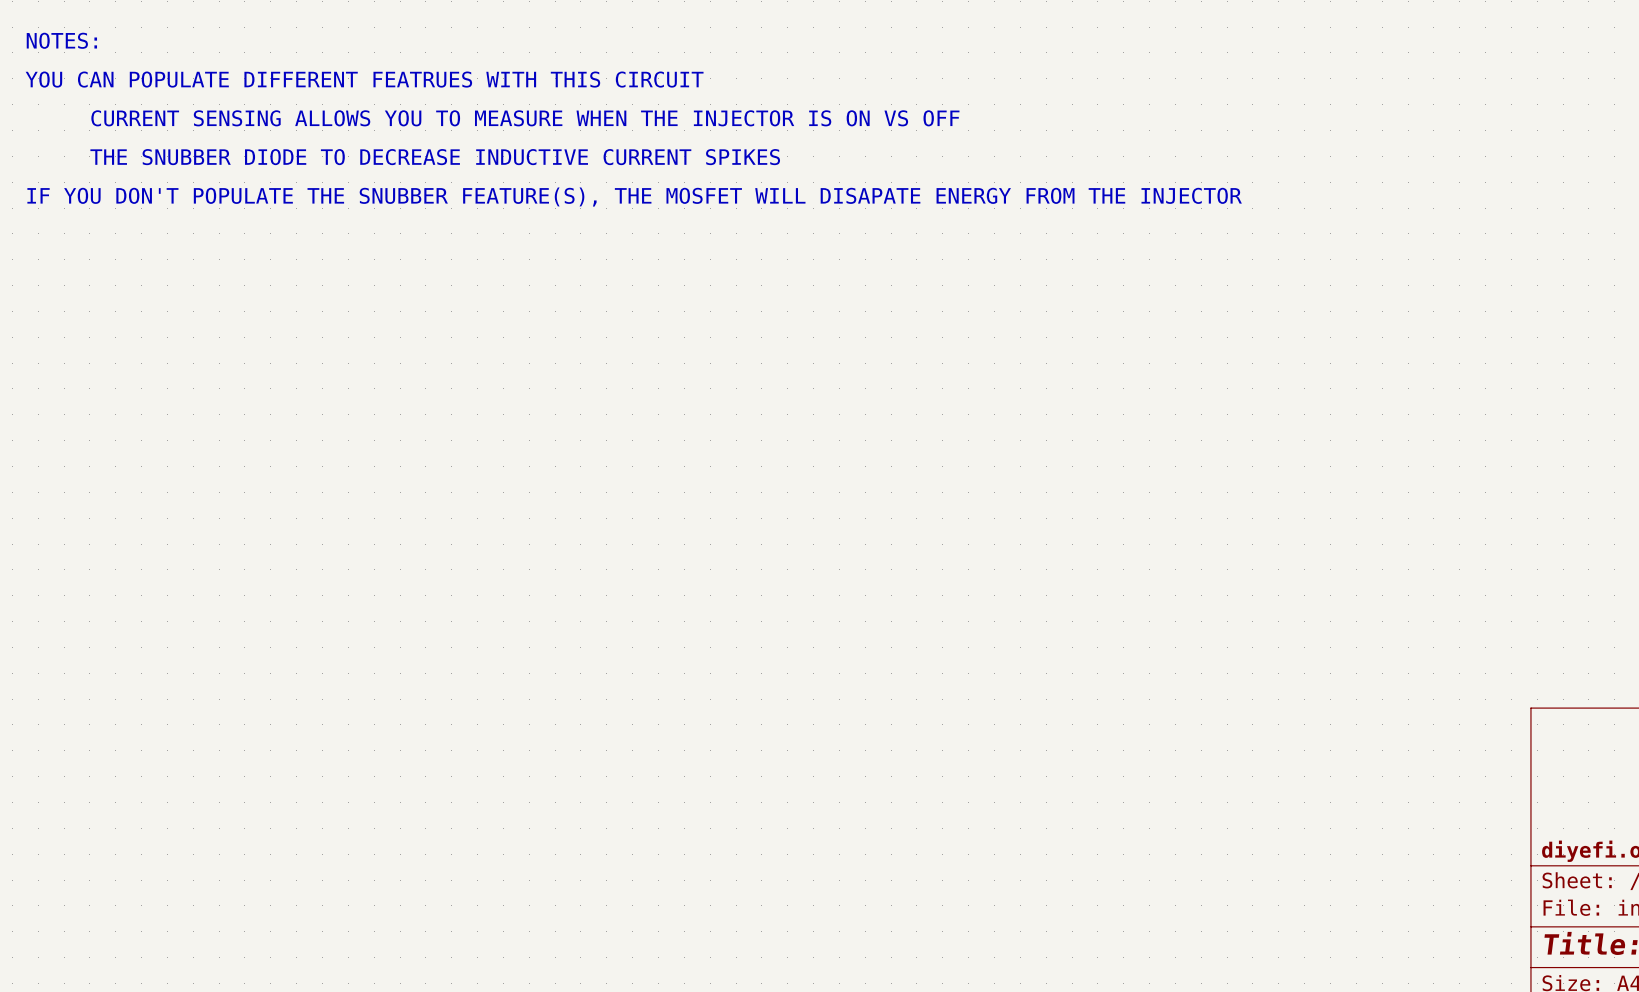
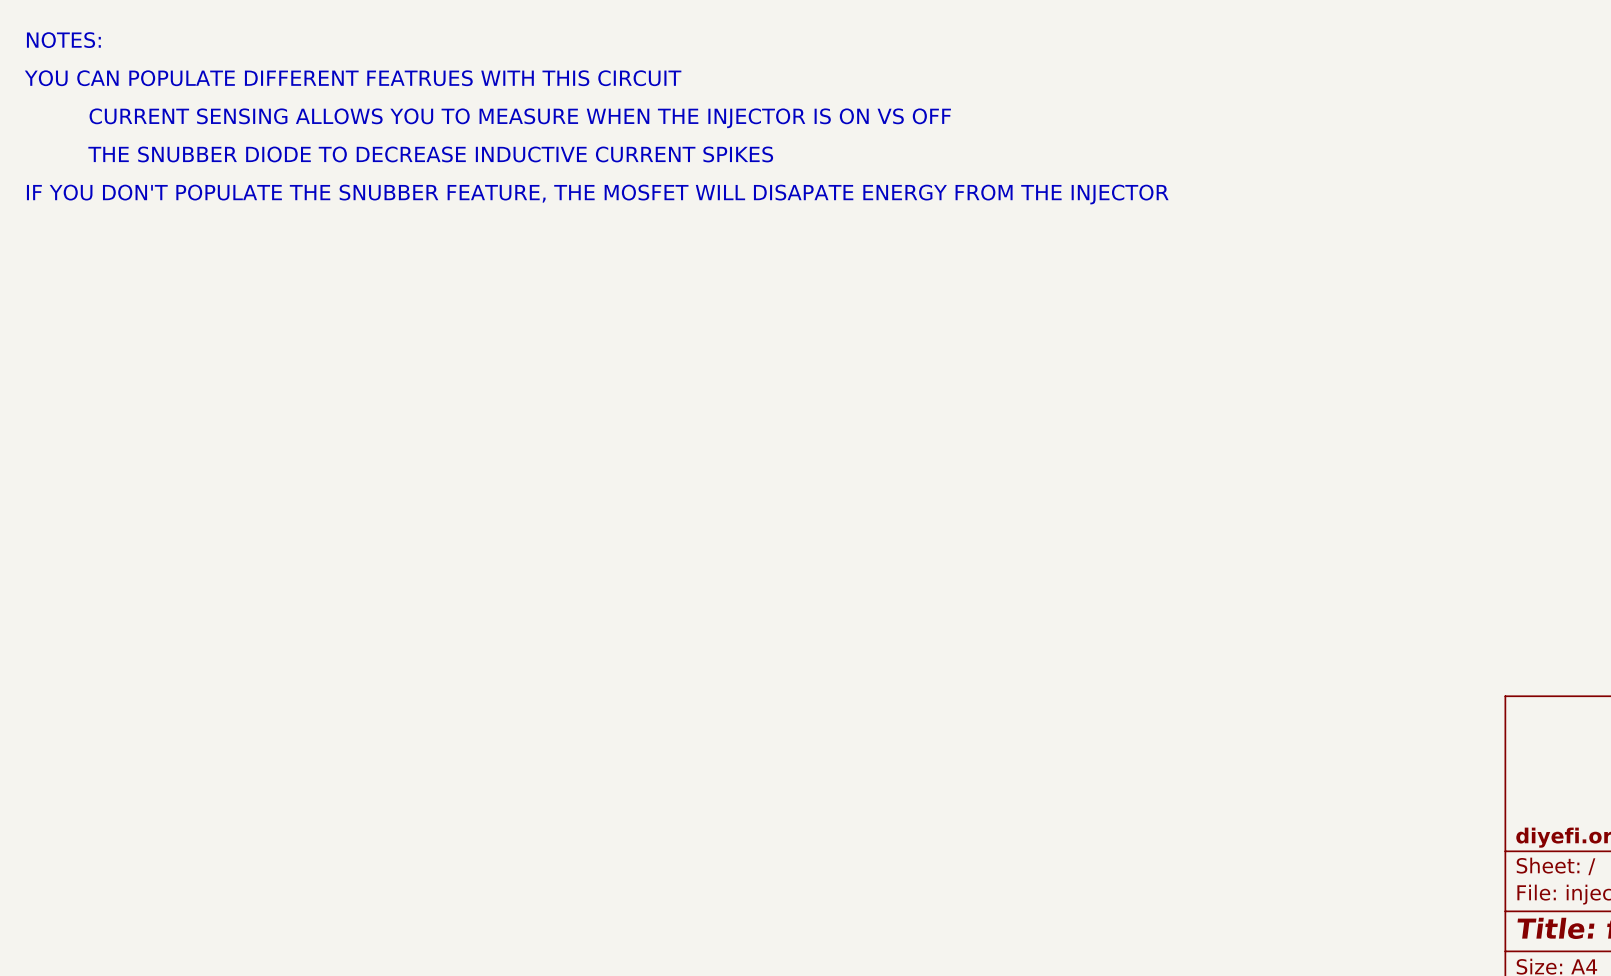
text: IF YOU DON'T POPULATE THE SNUBBER FEATURE(S), THE MOSFET WILL DISAPATE ENERGY FROM THE INJECTOR (634, 197) -> IF YOU DON'T POPULATE THE SNUBBER FEATURE, THE MOSFET WILL DISAPATE ENERGY FROM THE INJECTOR (597, 194)

